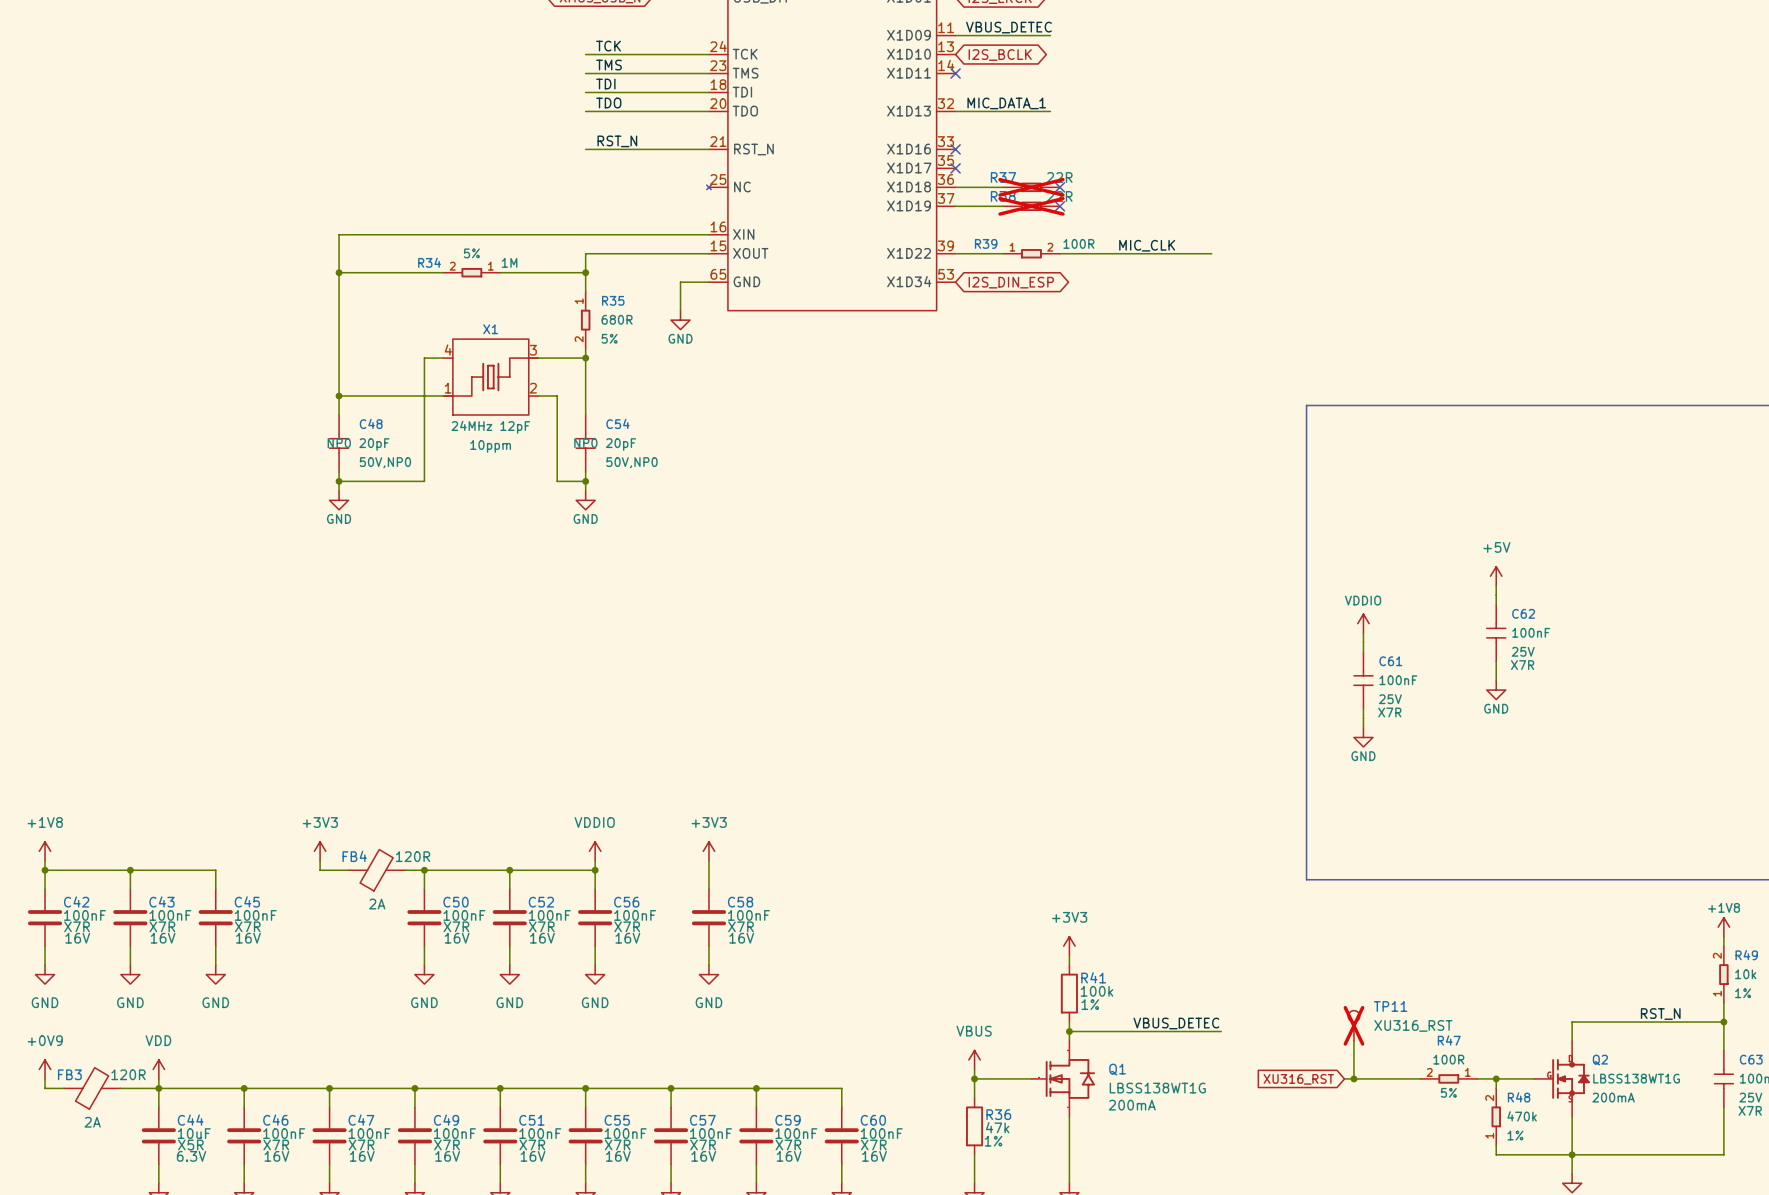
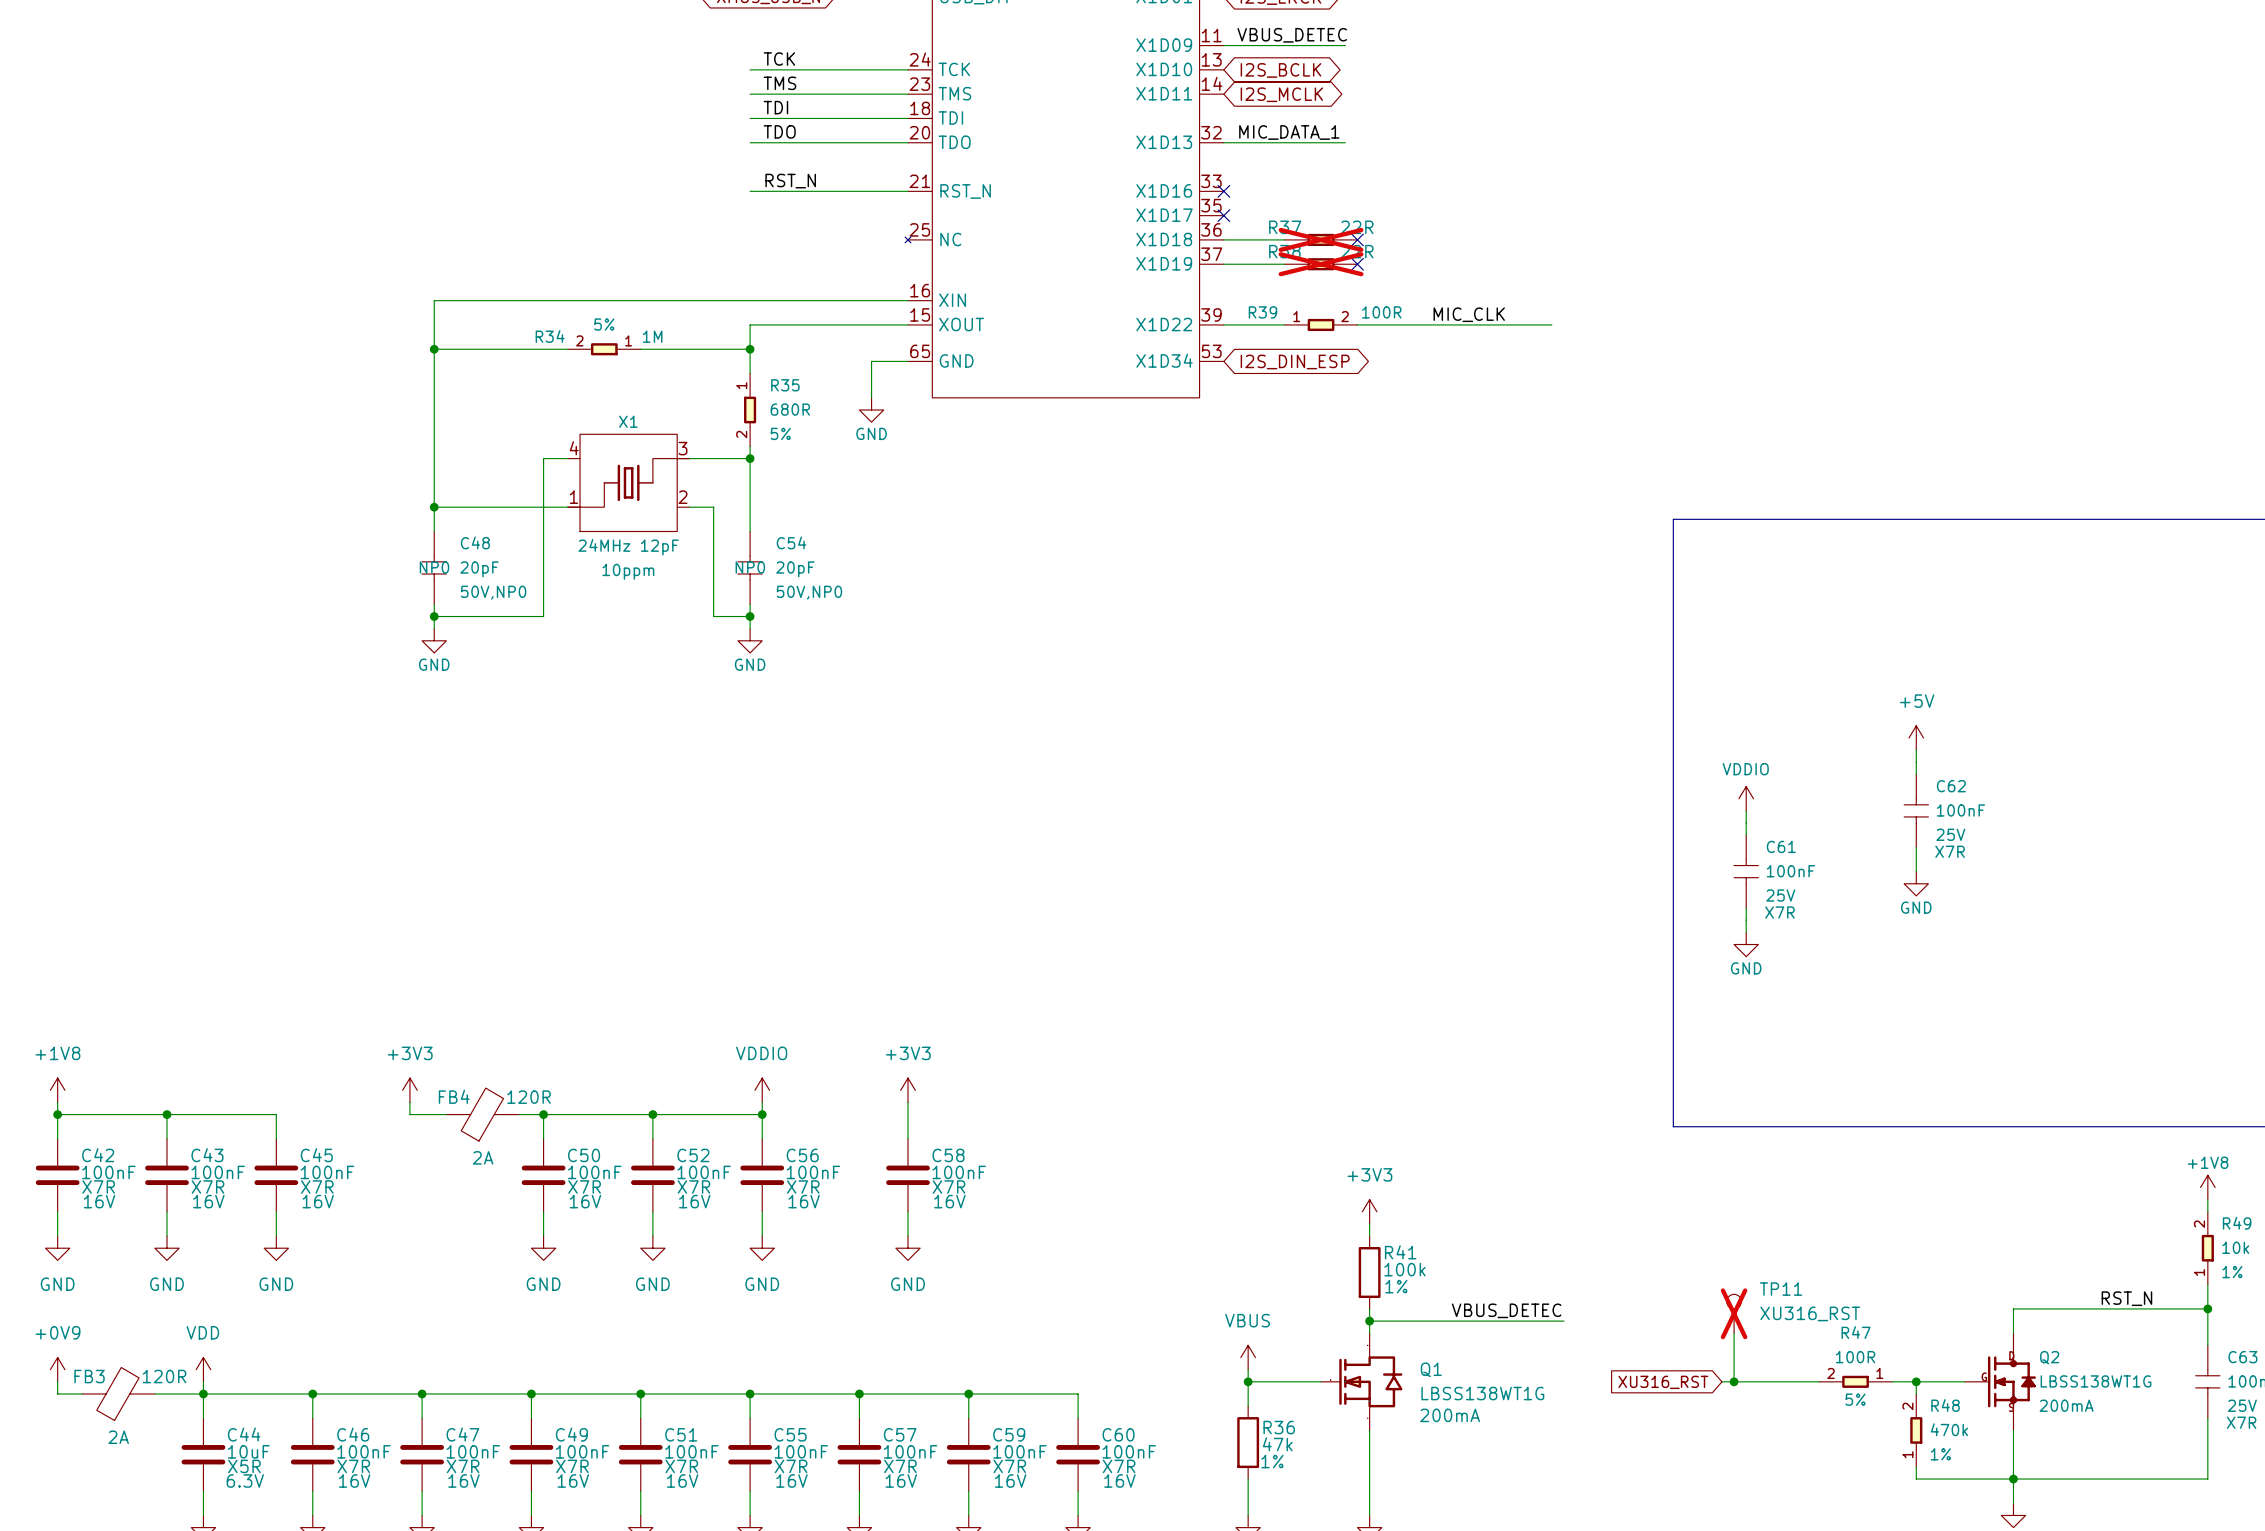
no-connect mark: (955, 73) -> none
global label: none -> I2S_MCLK (1281, 94)

